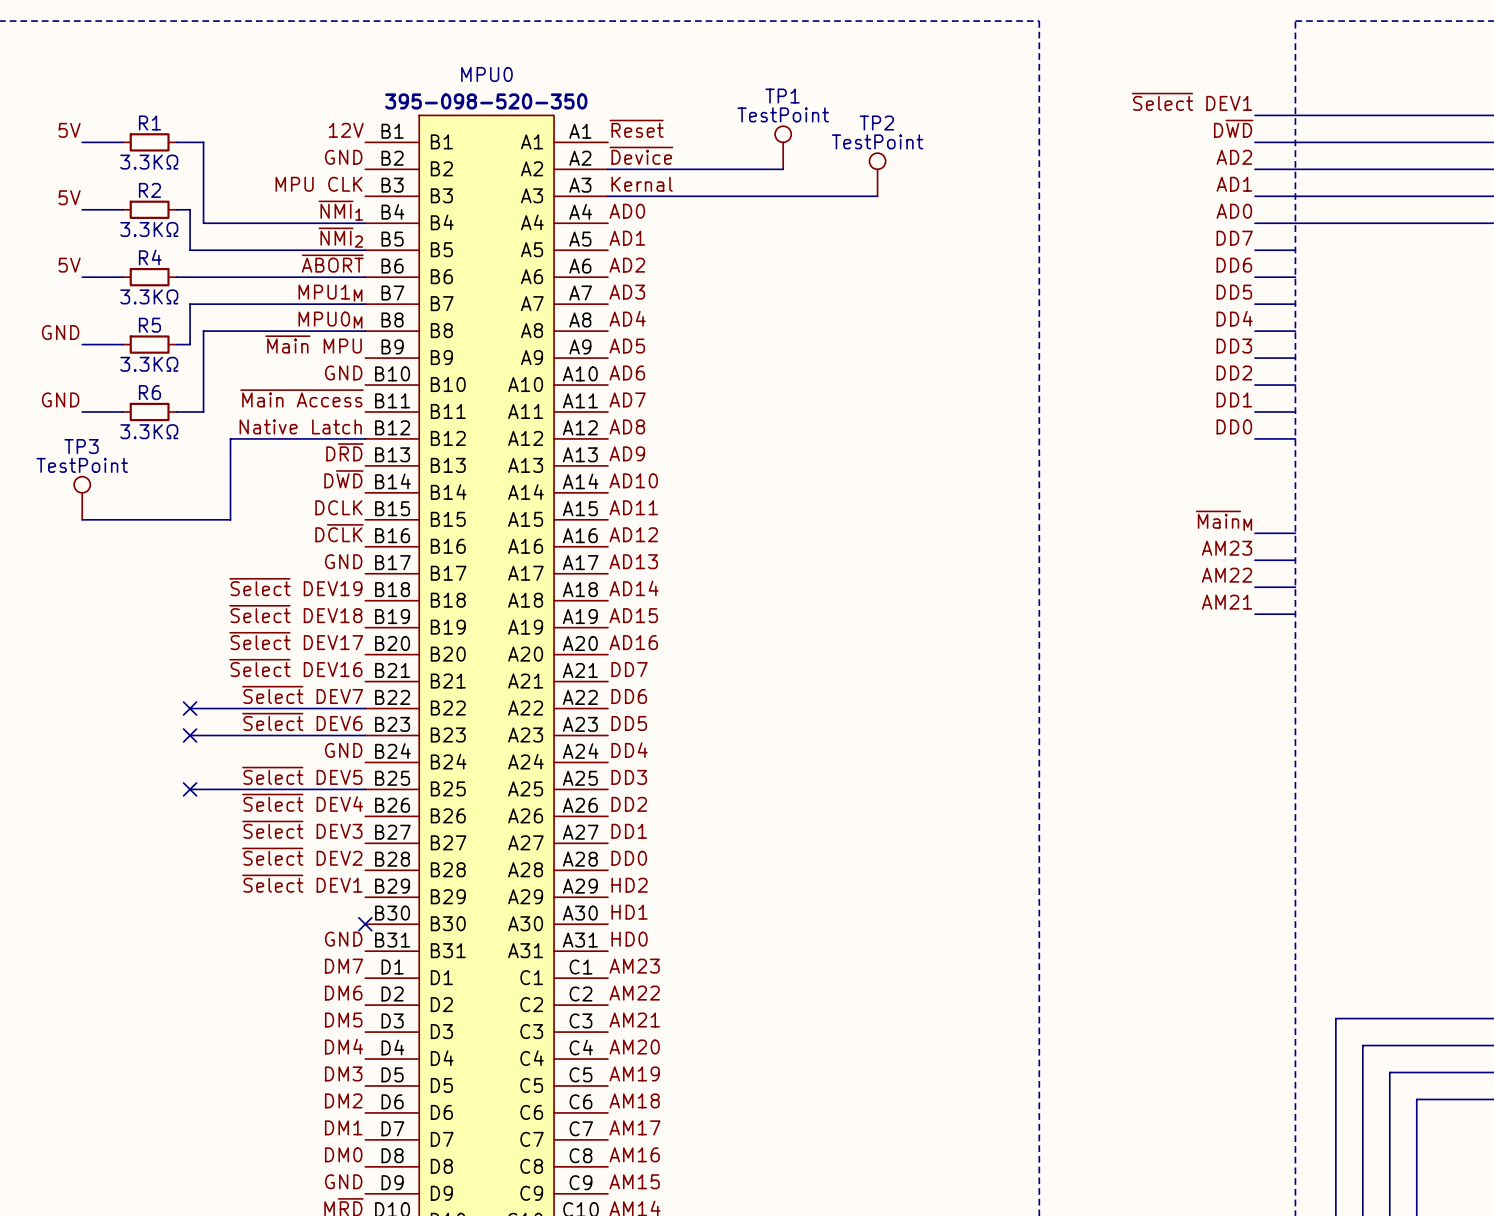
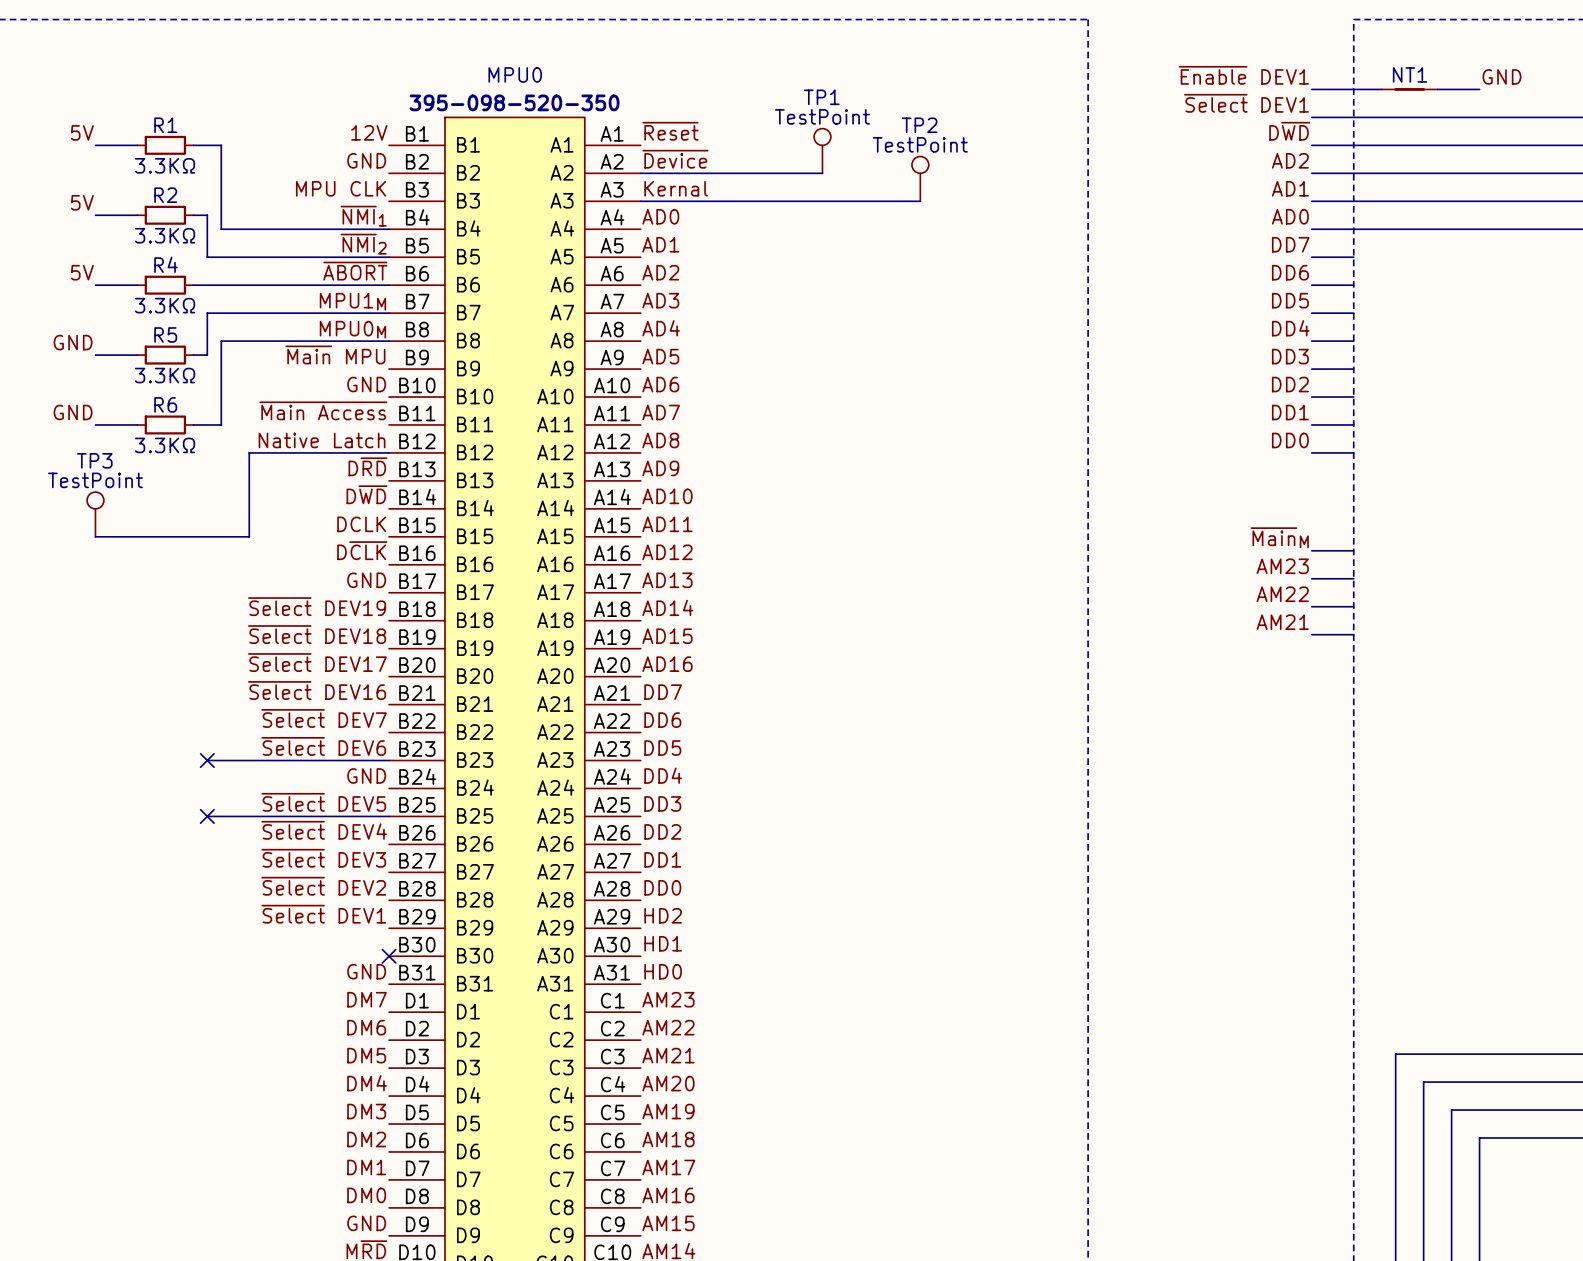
label: none -> ~{Enable} DEV1 (1243, 75)
label: none -> GND (1501, 76)
wire: none -> (1311, 89) (1381, 89)
NT1: none -> (1409, 89)
wire: none -> (1437, 89) (1479, 89)
wire: (190, 708) (365, 708) -> none
no-connect mark: (190, 708) -> none

